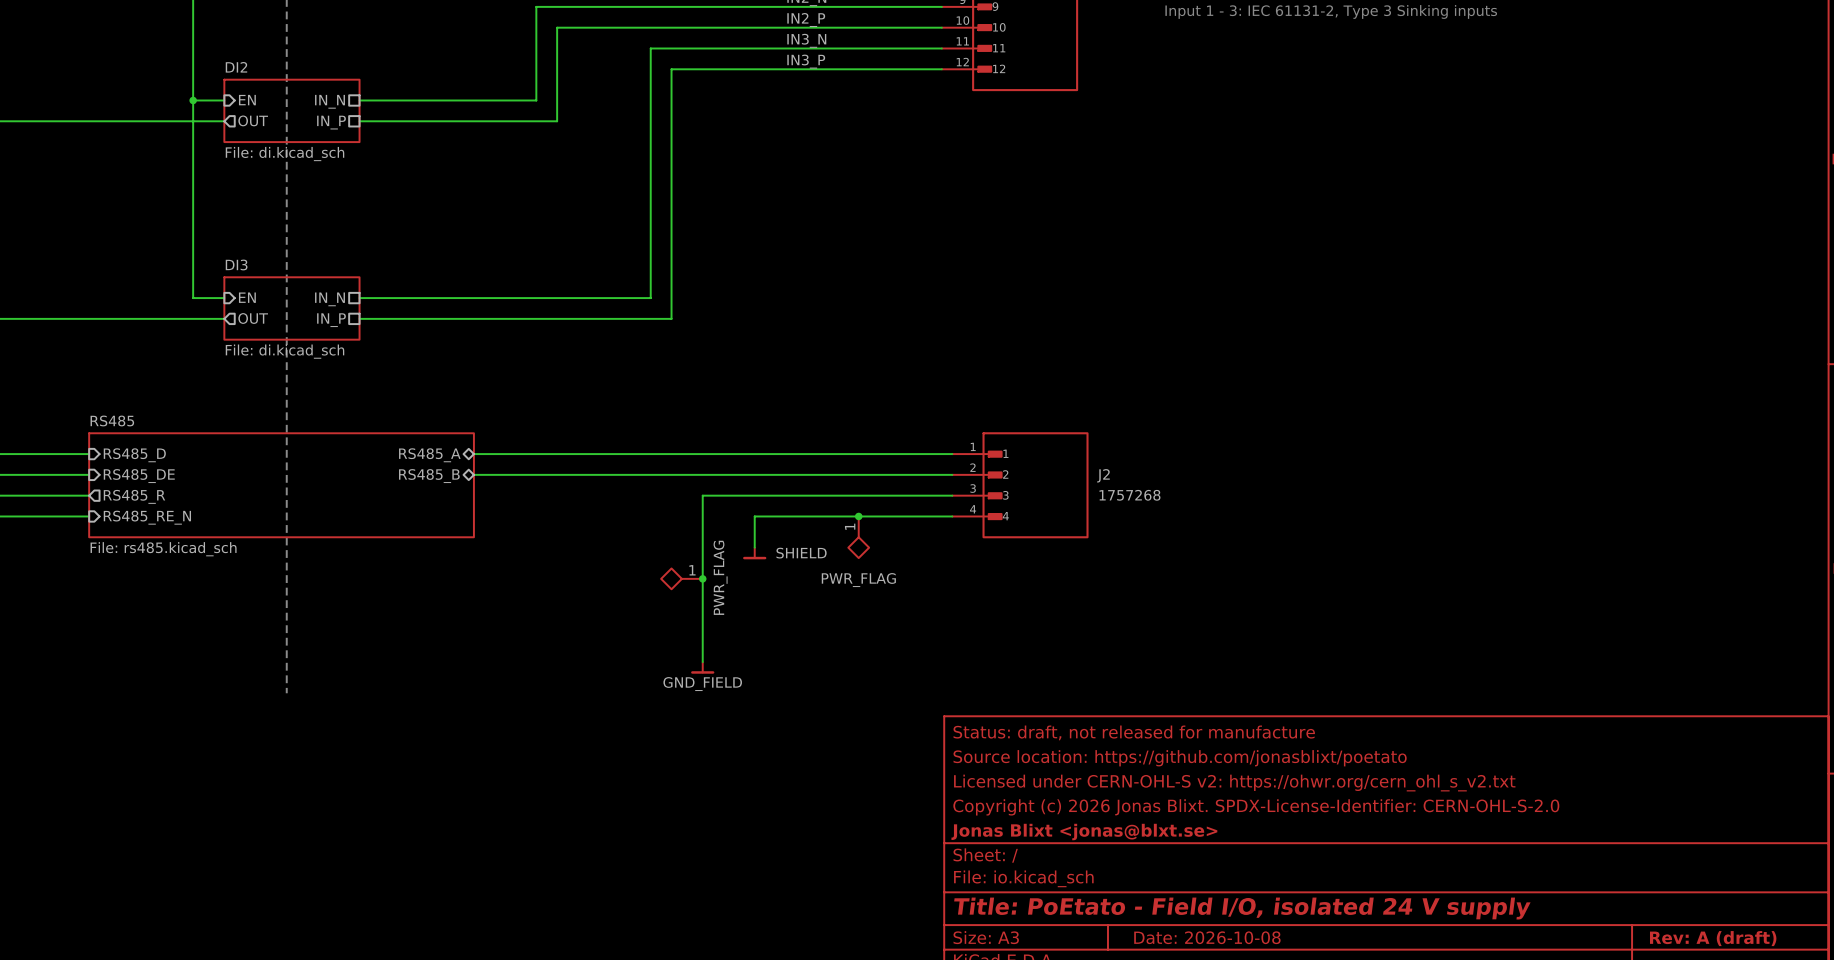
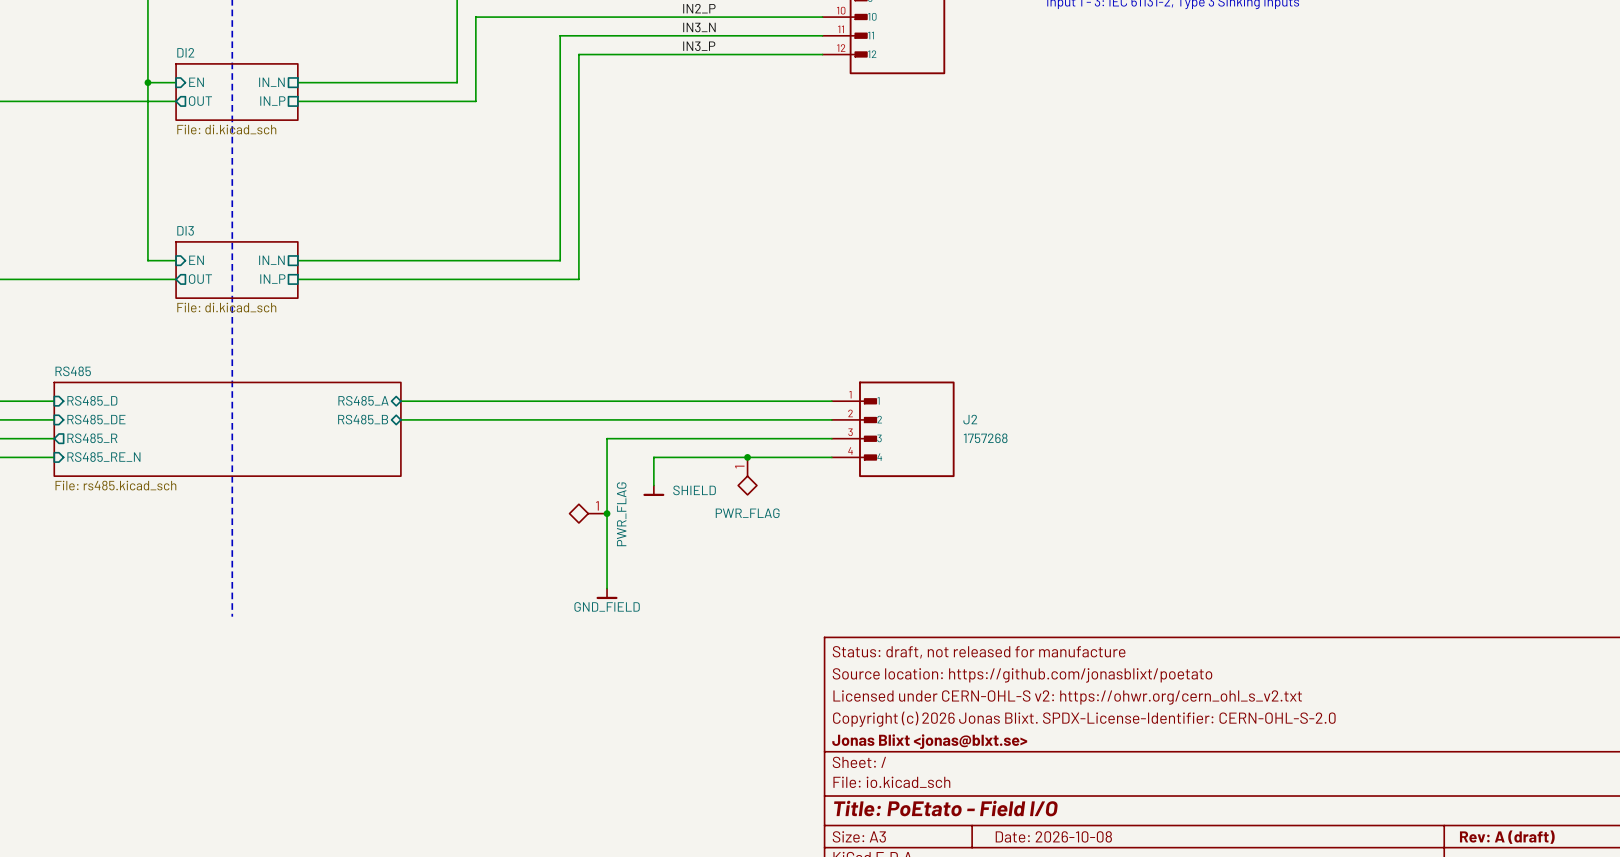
title block: Title: PoEtato - Field I/O, isolated 24 V supply (1242, 908) -> Title: PoEtato - Field I/O (945, 808)

